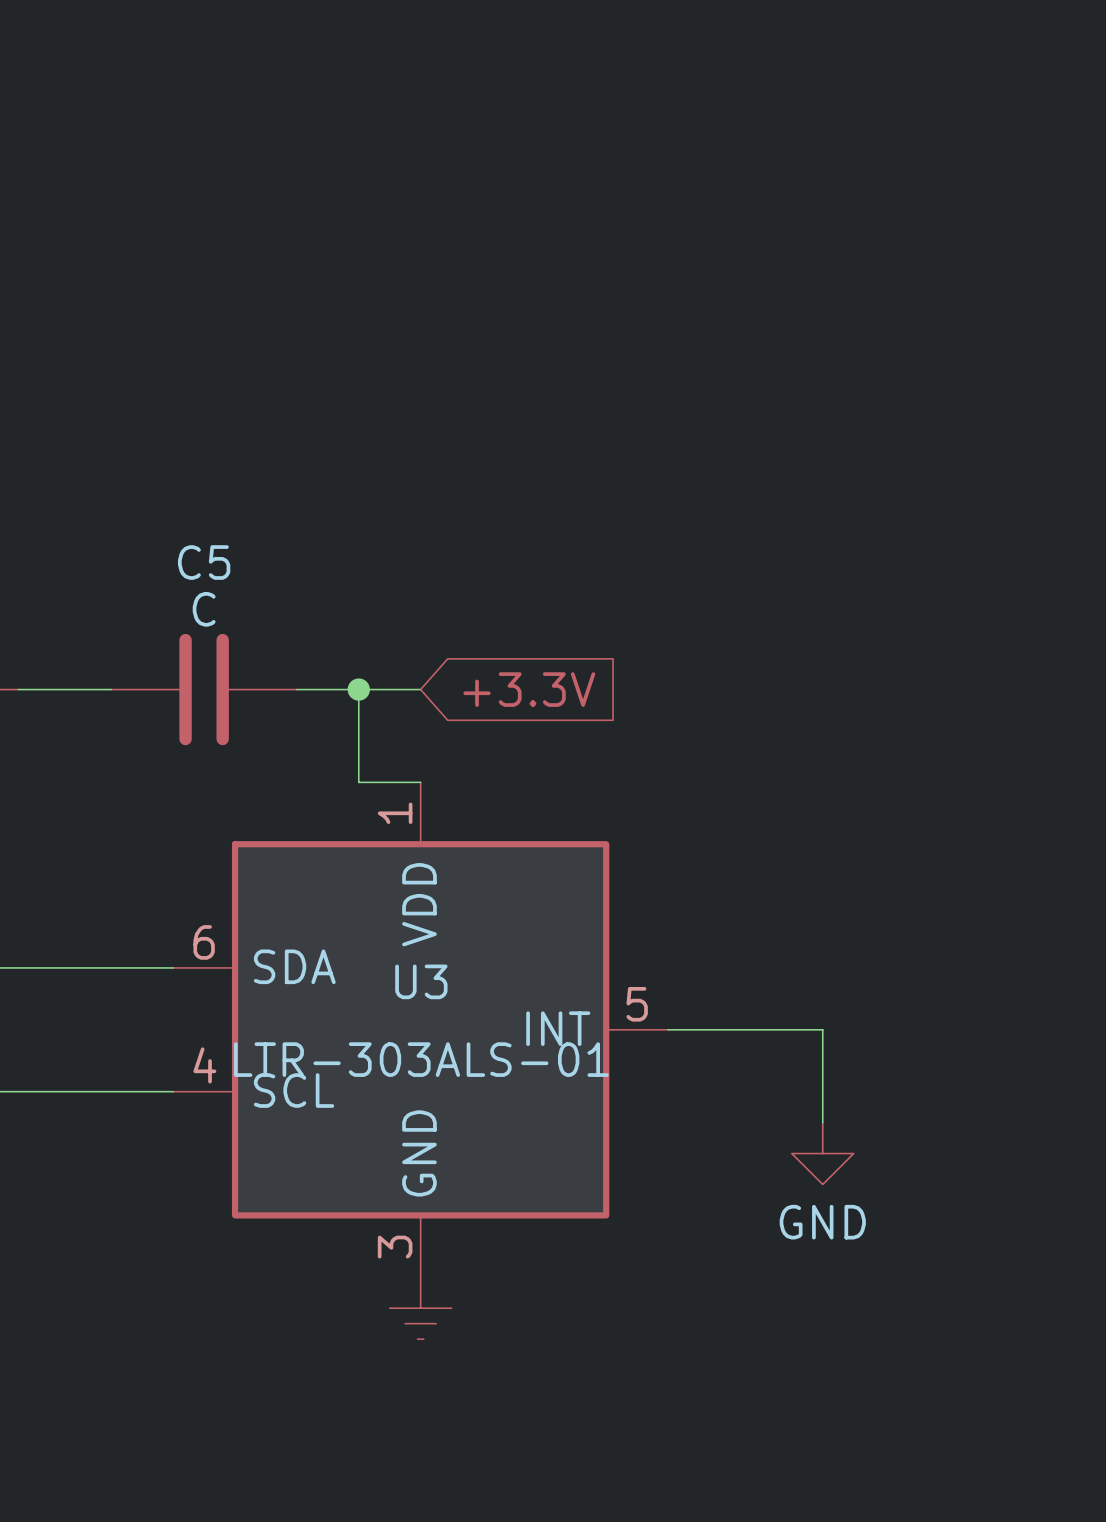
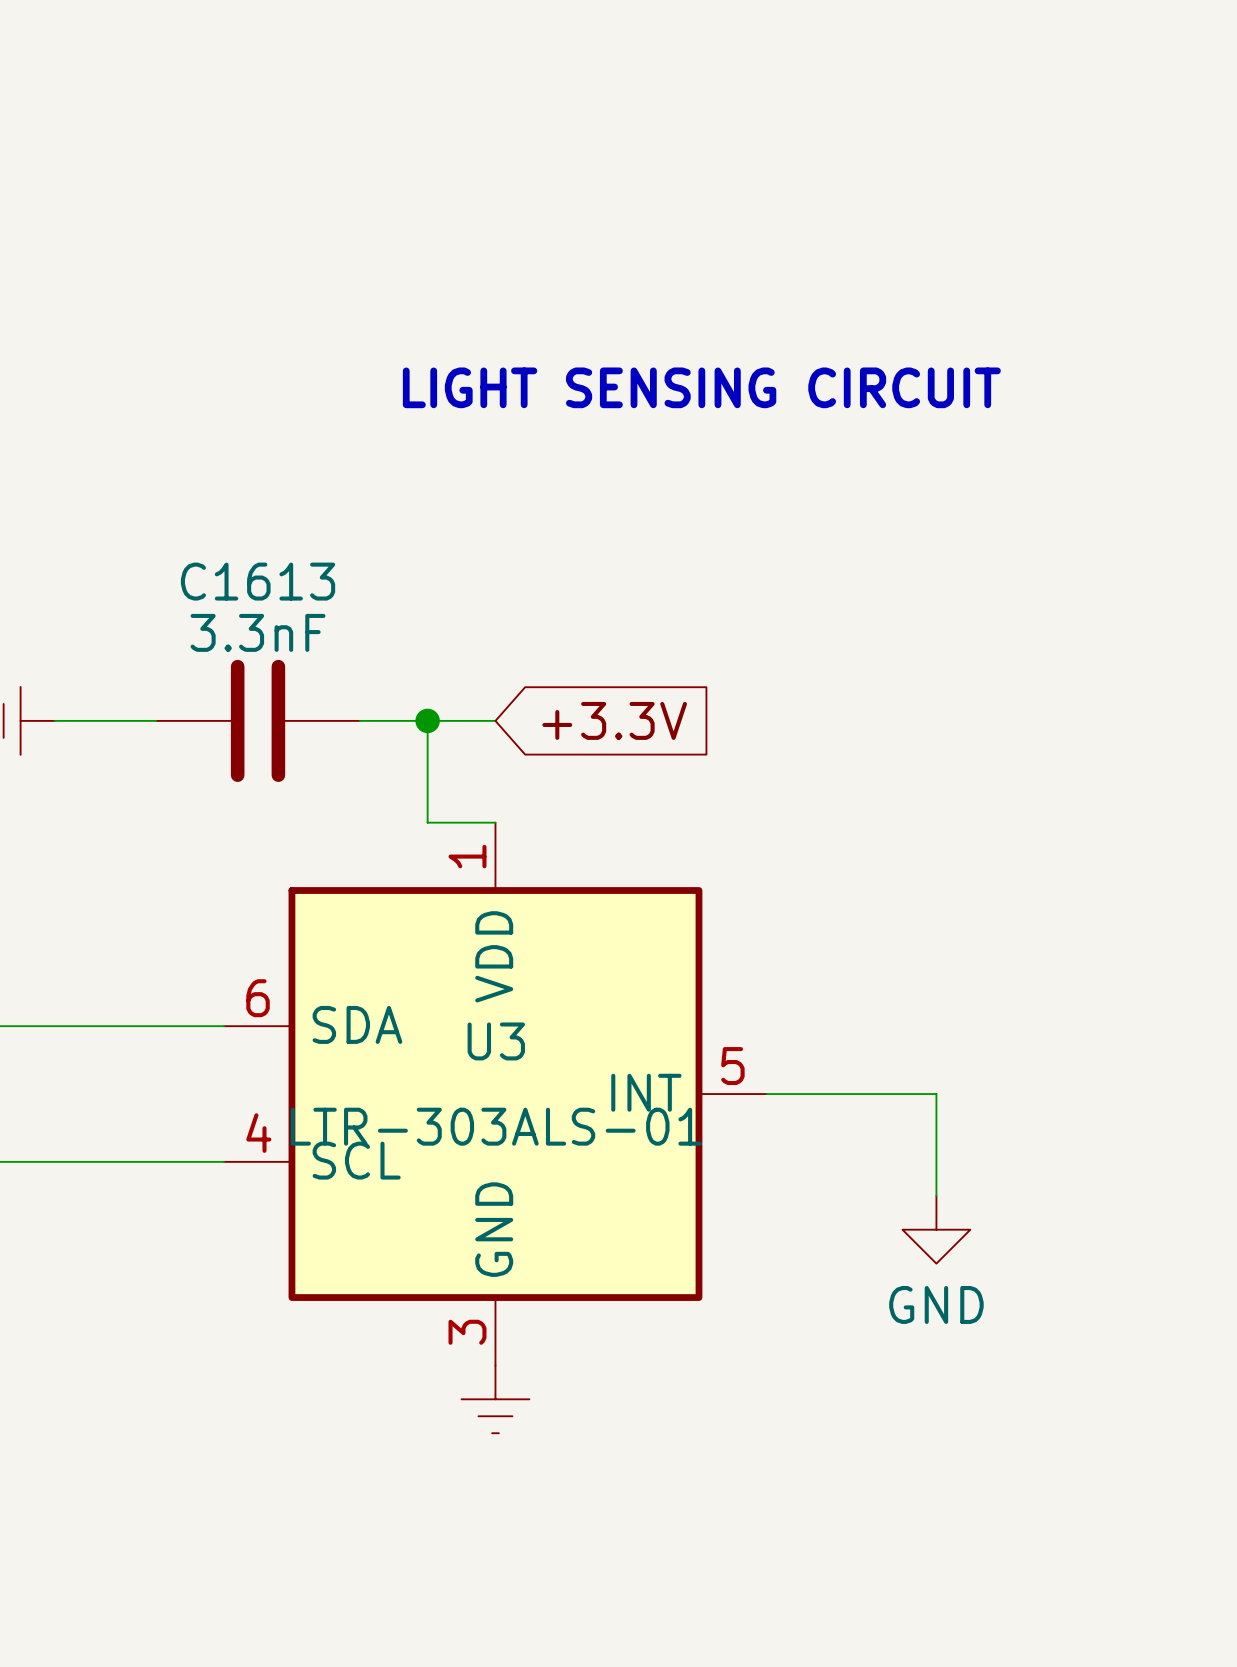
text: none -> LIGHT SENSING CIRCUIT (701, 387)
C5 name: C5 (204, 562) -> C1613 (258, 581)
C5 value: C (204, 609) -> 3.3nF (258, 632)

